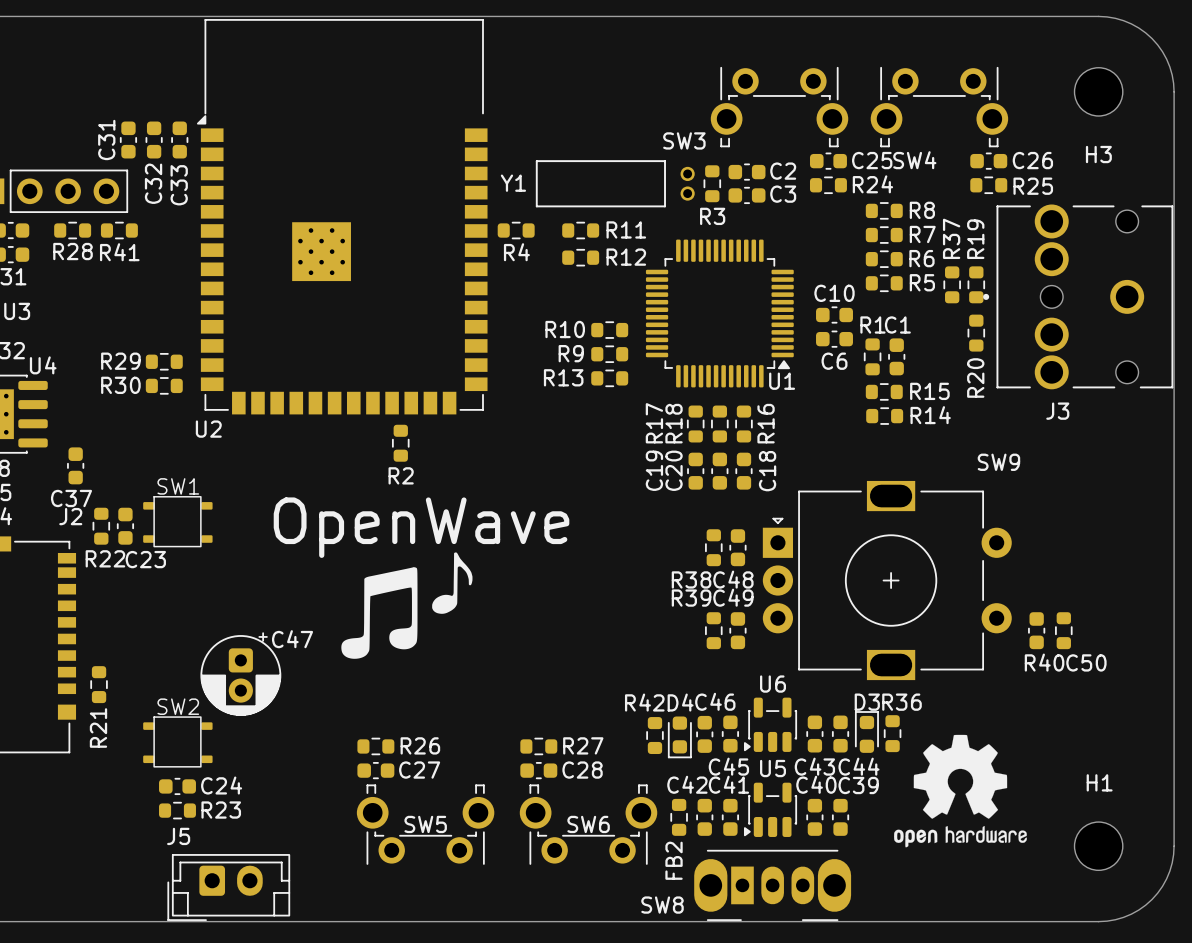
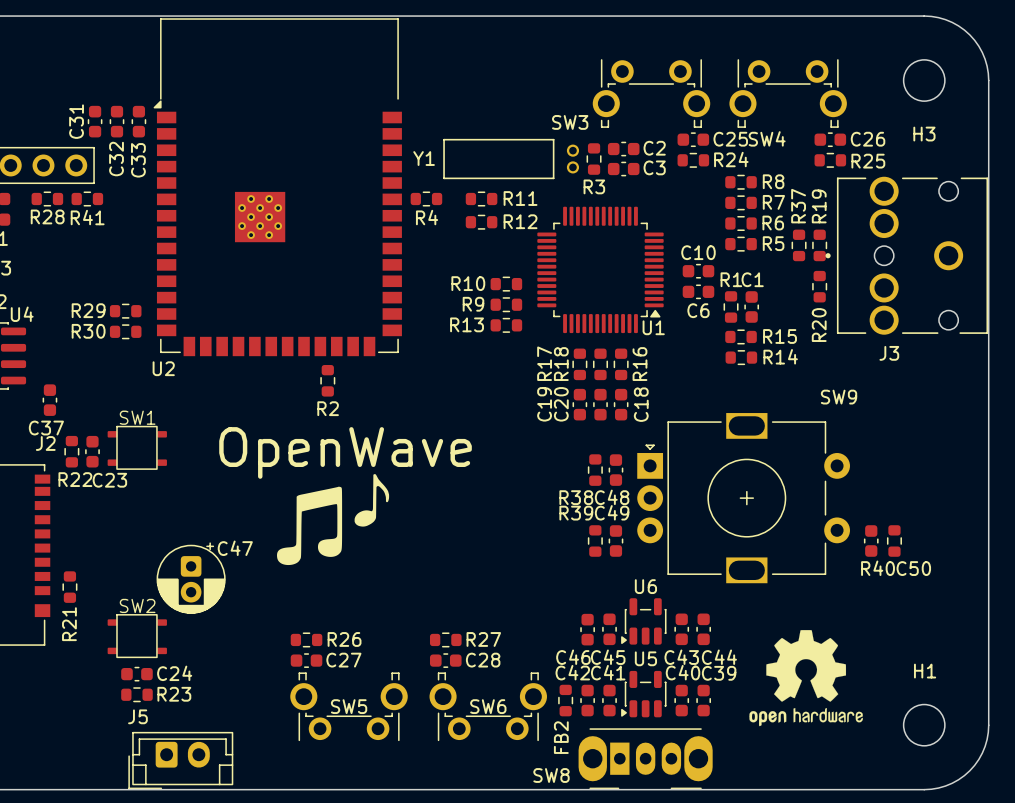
C46 name position: C46 (715, 701) -> C46 (573, 657)
D3: (866, 731) -> none
R36: (892, 733) -> none
R42: (654, 735) -> none
D4: (679, 737) -> none

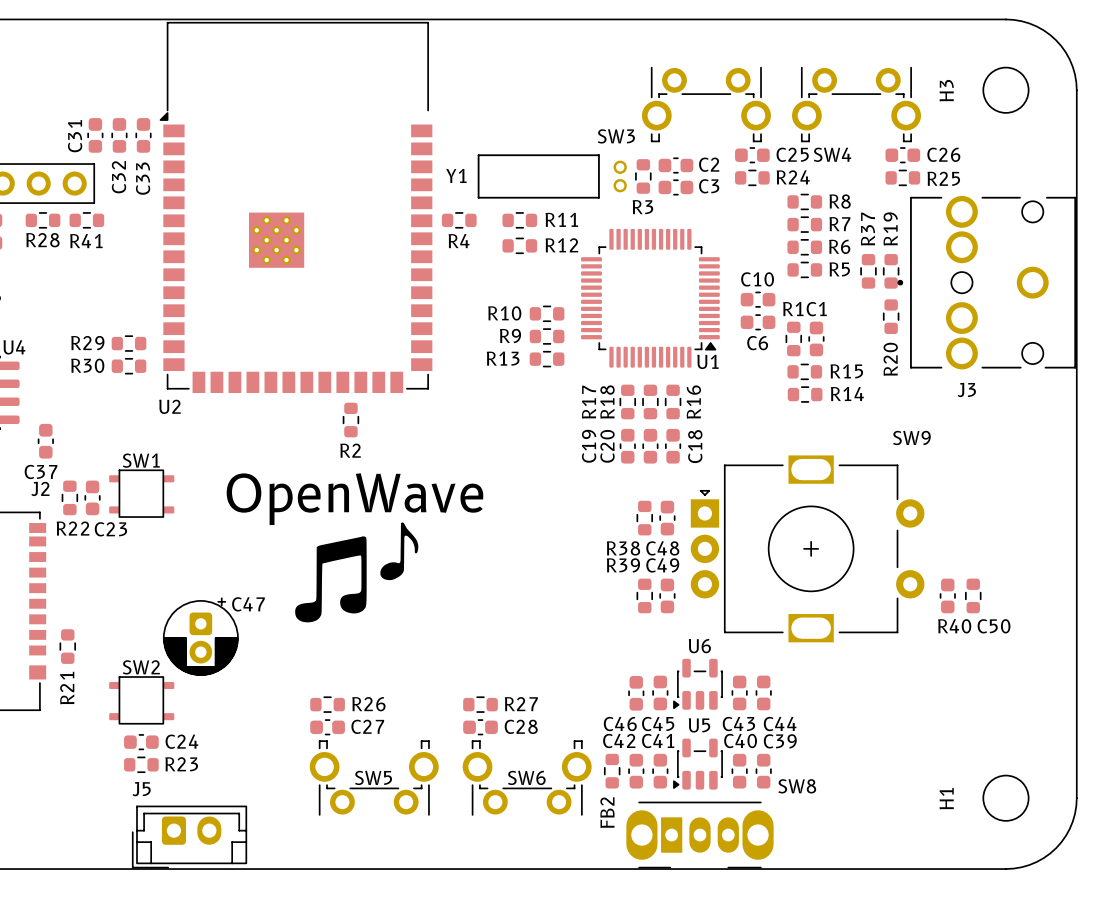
H3 name rotation: 0° (924, 134) -> 90° counterclockwise (946, 90)
H3 name position: H3 (924, 134) -> H3 (946, 90)
drawing: [749, 630, 863, 727] -> none
H1 name rotation: 0° (925, 671) -> 90° counterclockwise (946, 798)
H1 name position: H1 (925, 671) -> H1 (946, 798)
SW8 name position: SW8 (551, 775) -> SW8 (797, 786)

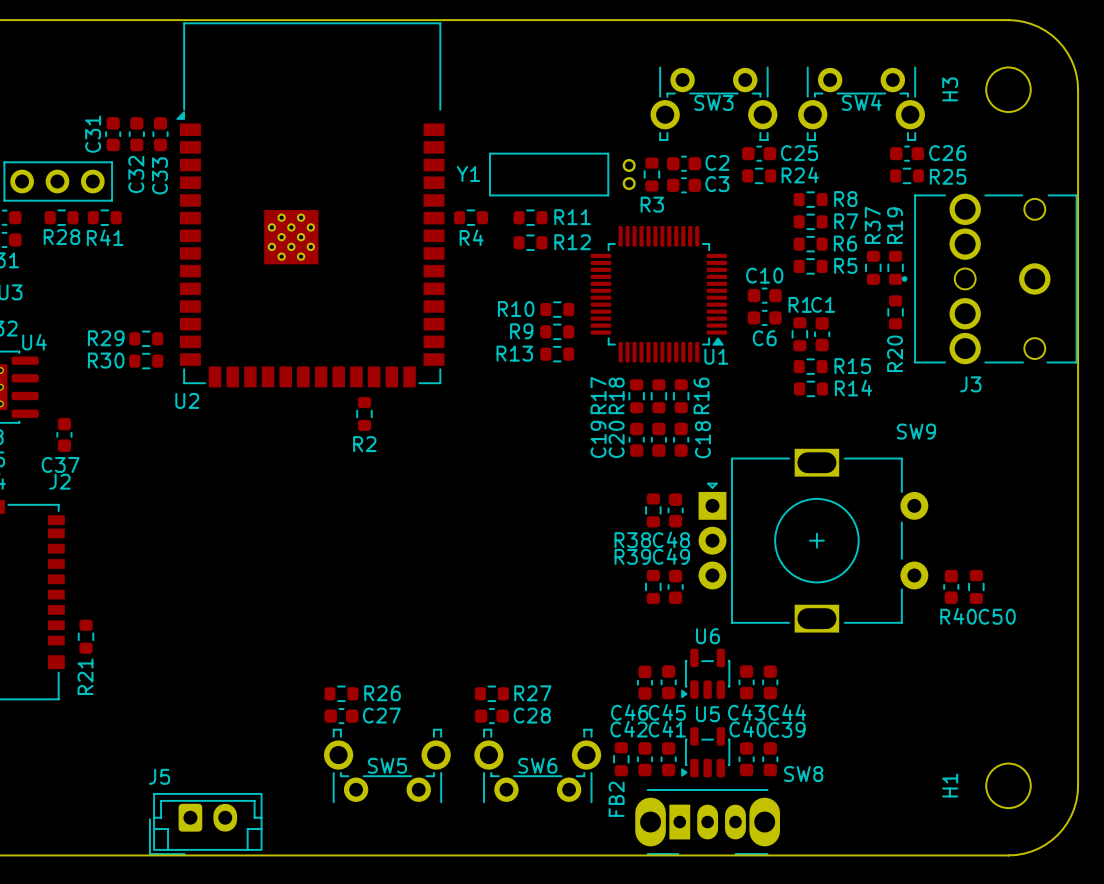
SW3 name position: SW3 (616, 136) -> SW3 (713, 102)
SW4 name position: SW4 (832, 154) -> SW4 (861, 102)
SW1: (141, 493) -> none
R22: (69, 497) -> none
C23: (92, 497) -> none
text: OpenWave (354, 499) -> none
drawing: [295, 522, 419, 623] -> none
C47: (200, 636) -> none
SW2: (141, 700) -> none
C24: (141, 742) -> none
R23: (141, 764) -> none

